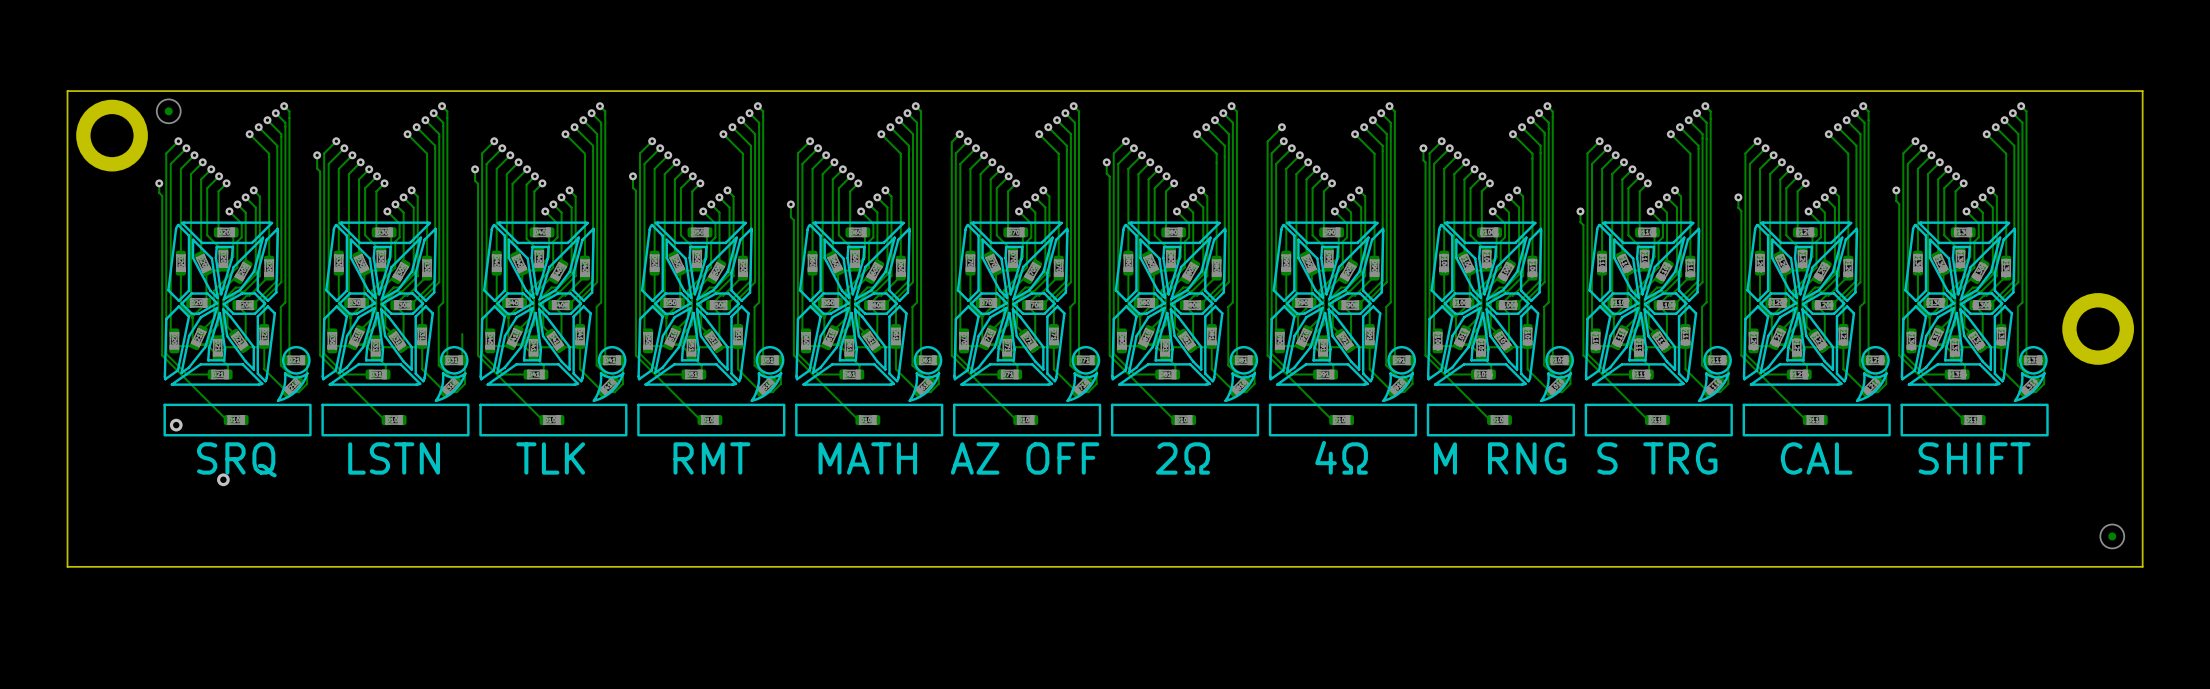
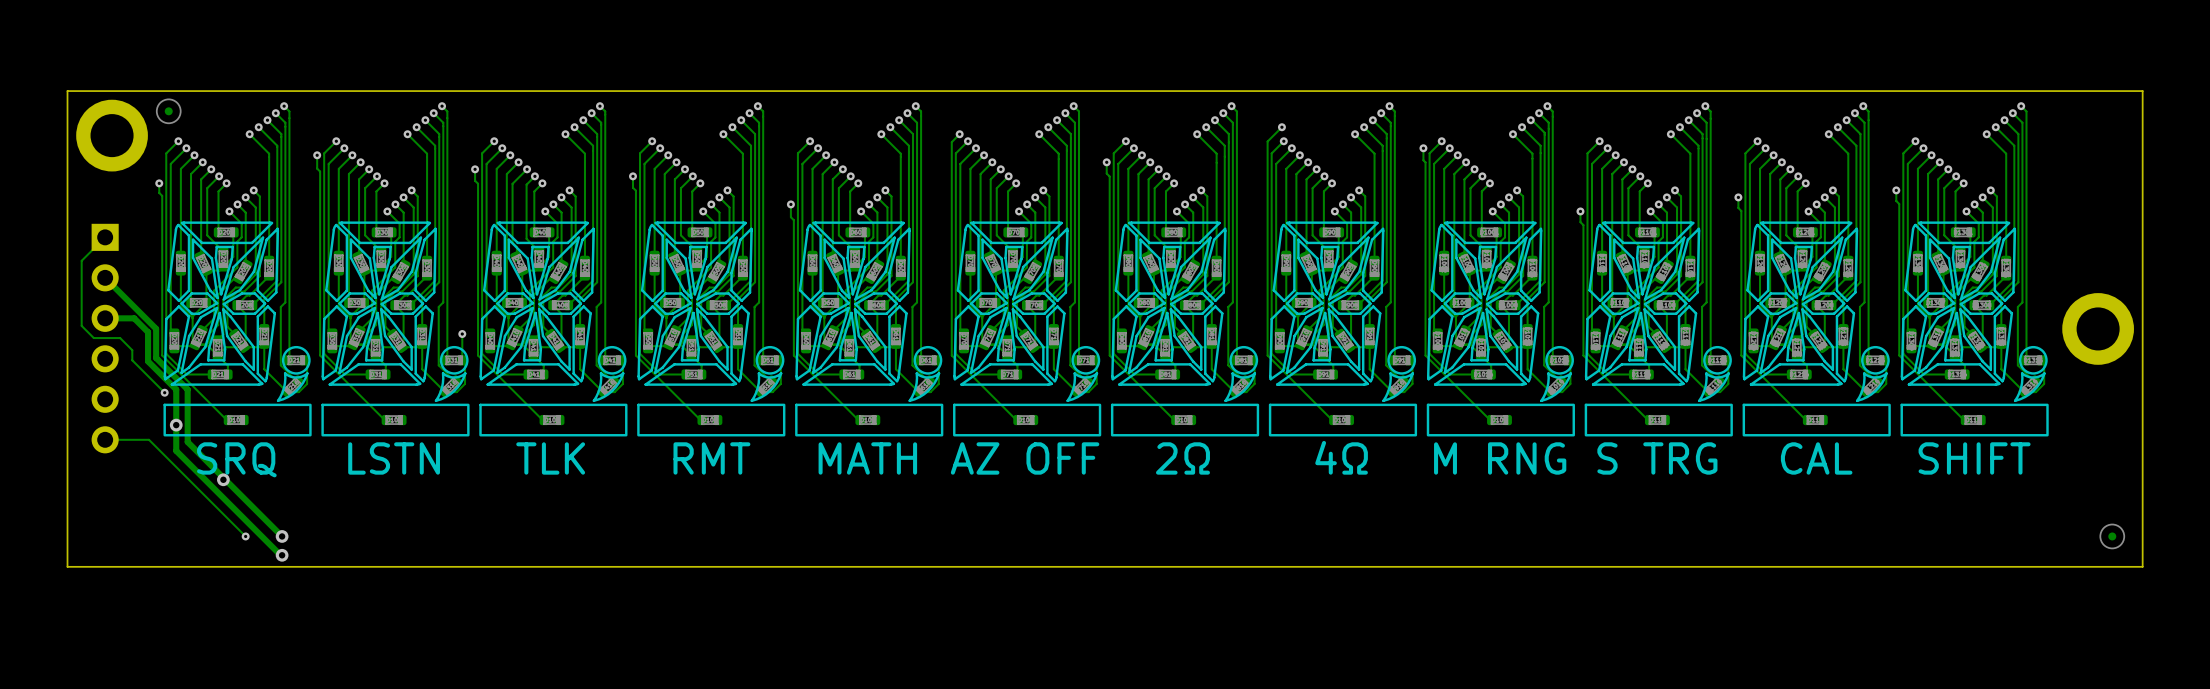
track: none -> (105, 237) (81, 260) (81, 325) (93, 338) (120, 338) (132, 350) (132, 360) (164, 392)
track: none -> (105, 277) (156, 328) (156, 358) (187, 389) (187, 442) (282, 536)
track: none -> (105, 318) (134, 318) (148, 332) (148, 361) (176, 389) (176, 450) (282, 555)
via: none -> (462, 334)
part: none -> (105, 338)
via: none -> (164, 392)
track: none -> (105, 439) (149, 439) (245, 536)
via: none -> (245, 536)
via: none -> (282, 536)
via: none -> (282, 555)

